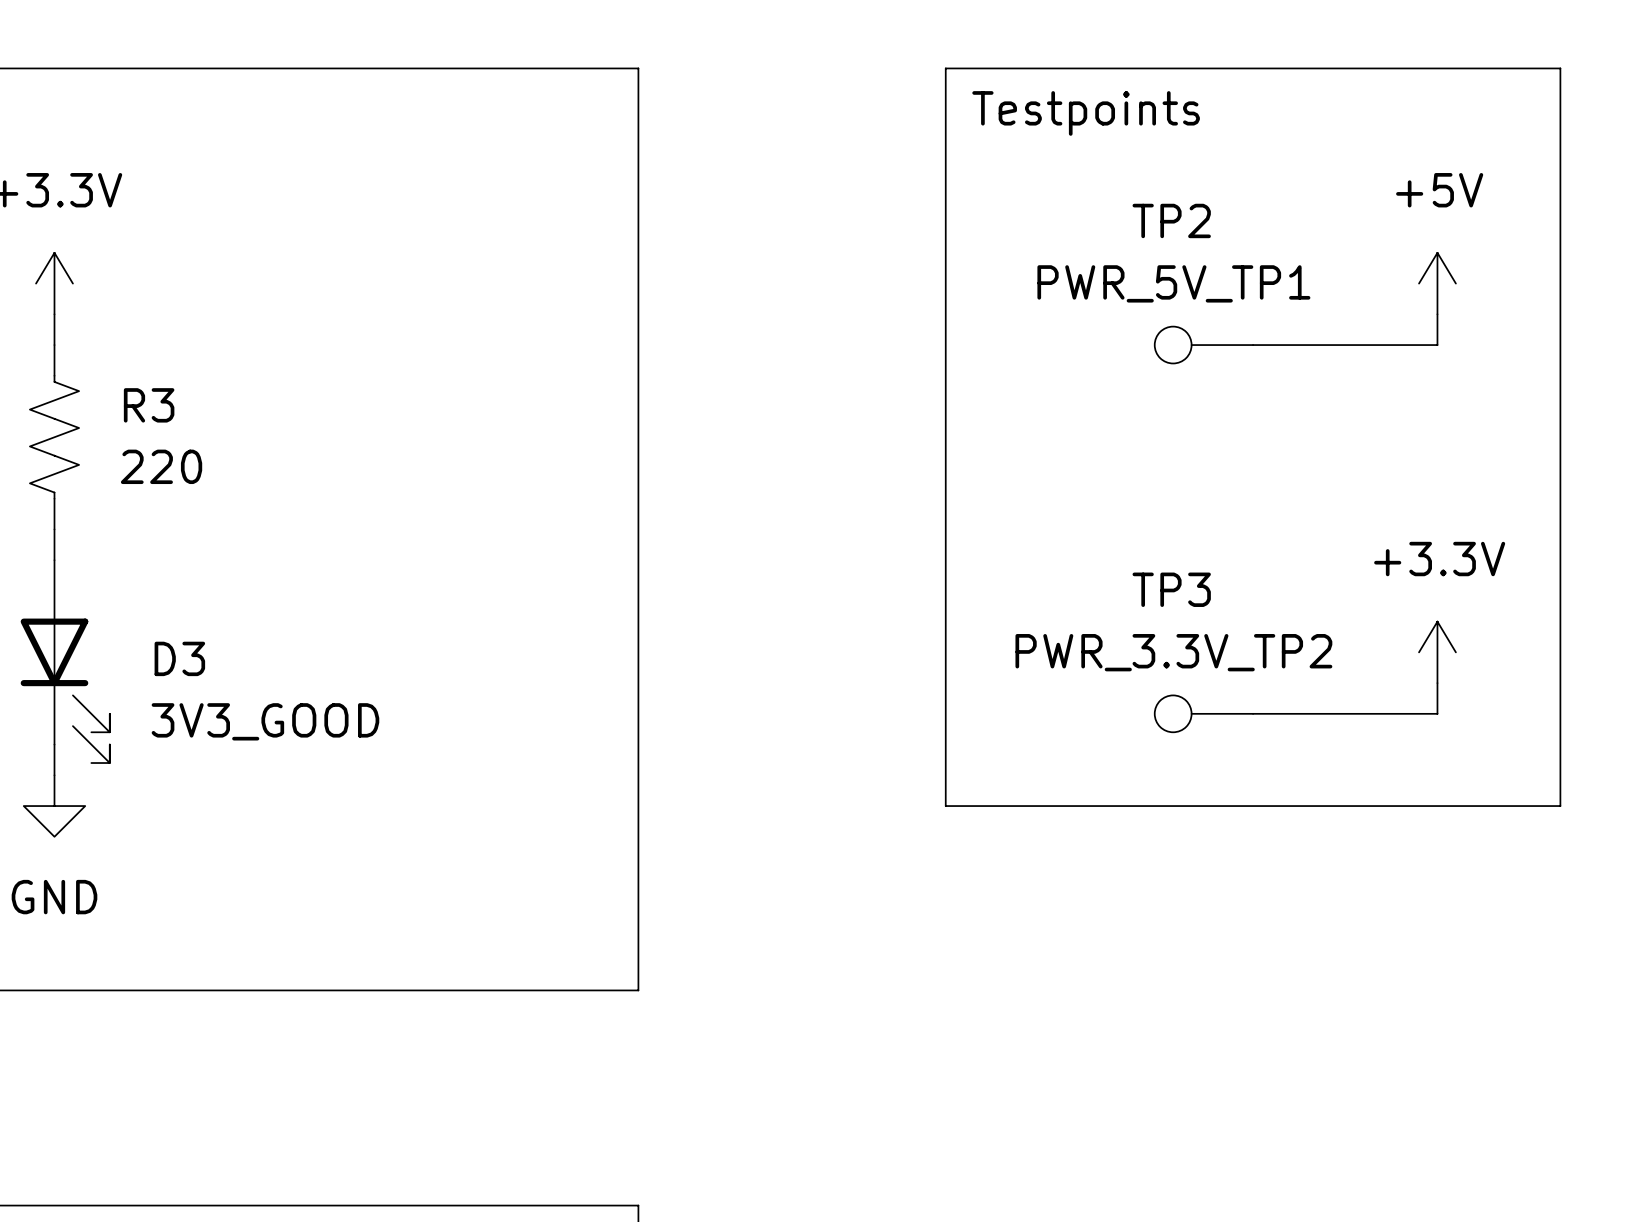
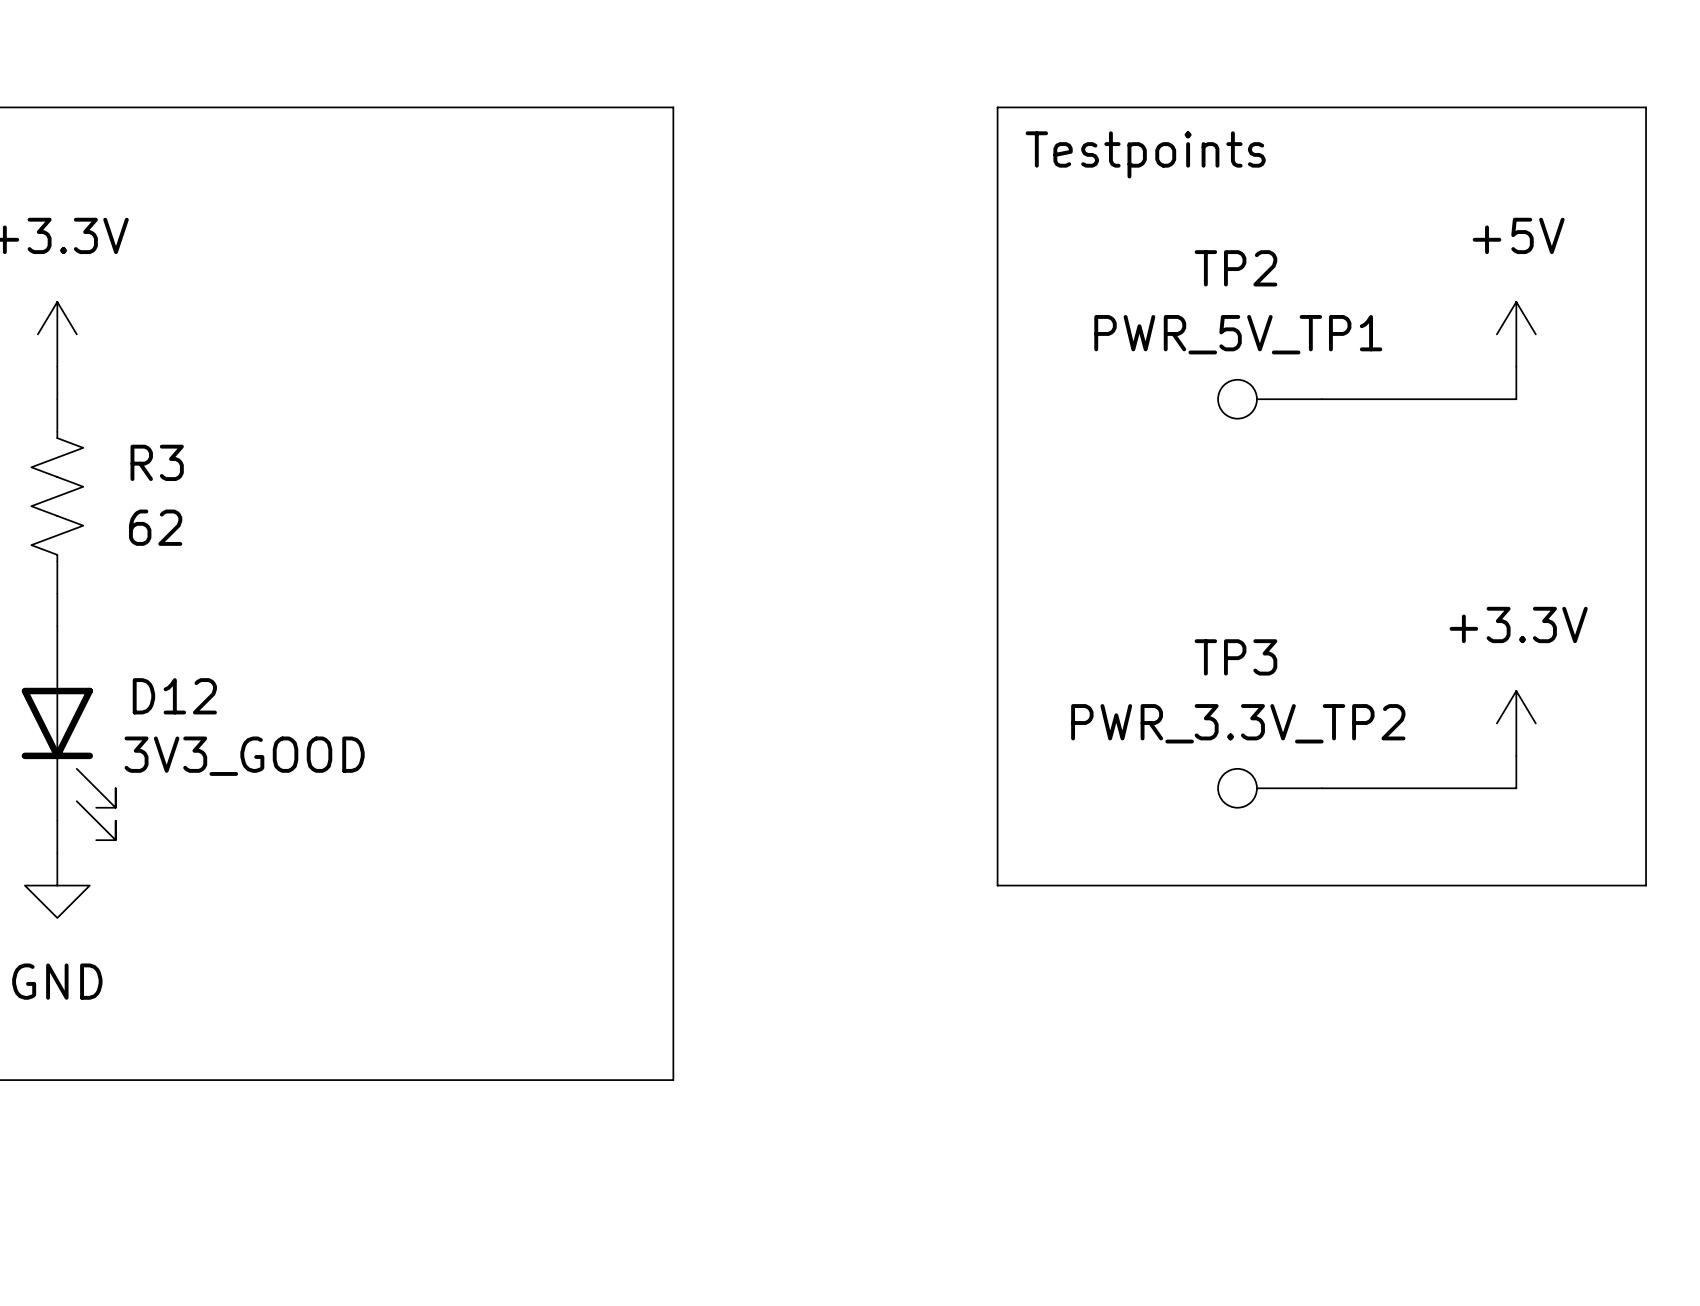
R3 value: 220 (161, 466) -> 62 (155, 527)
D3 name: D3 (179, 658) -> D12 (174, 696)
D3 value position: 3V3_GOOD (265, 721) -> 3V3_GOOD (244, 756)

